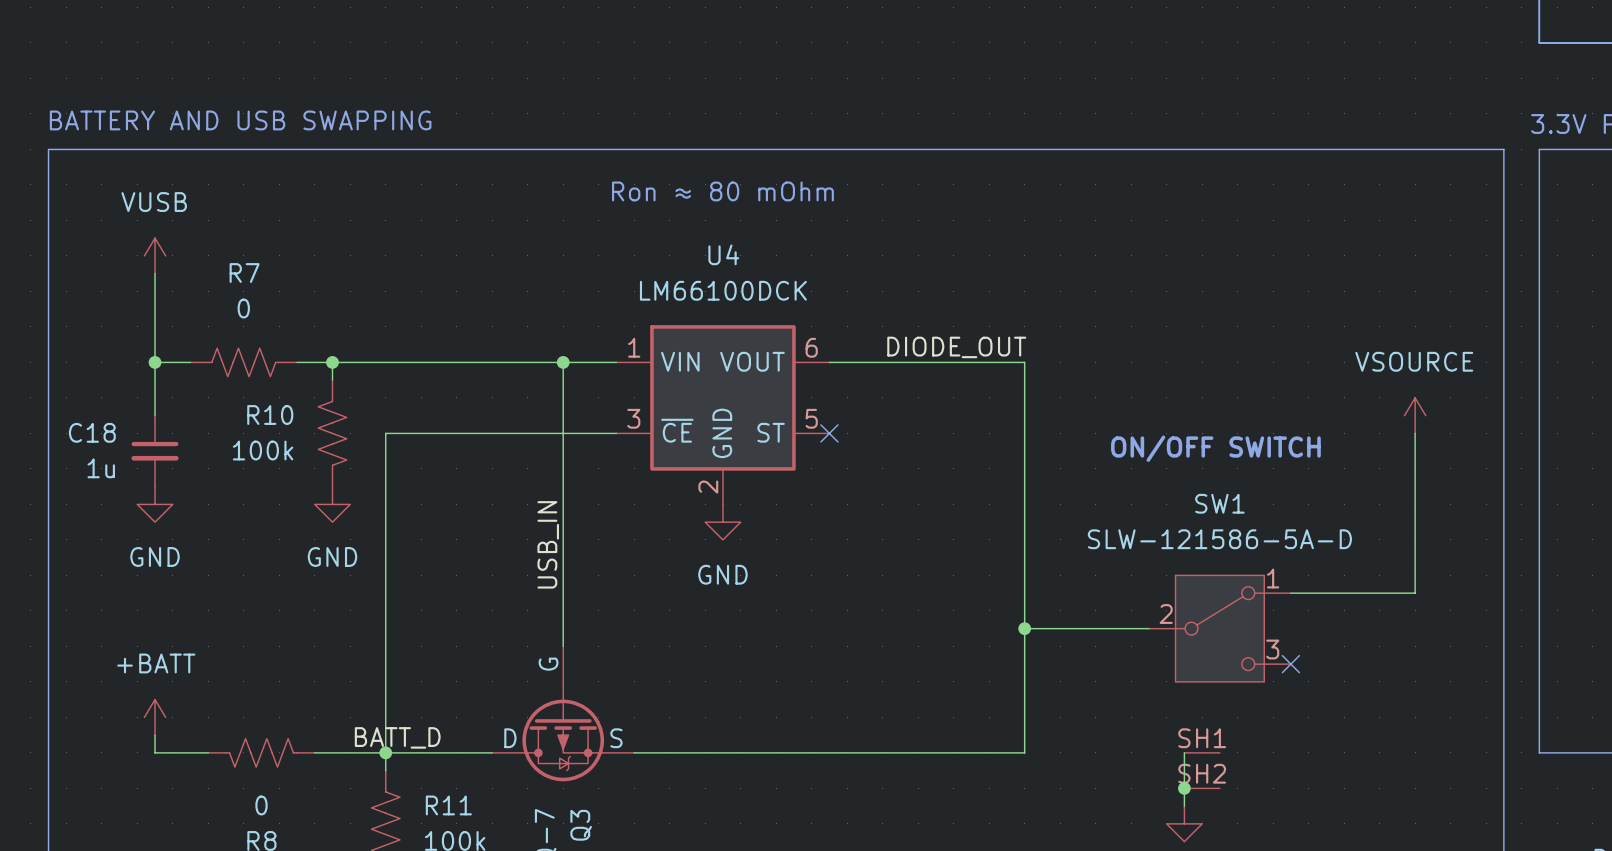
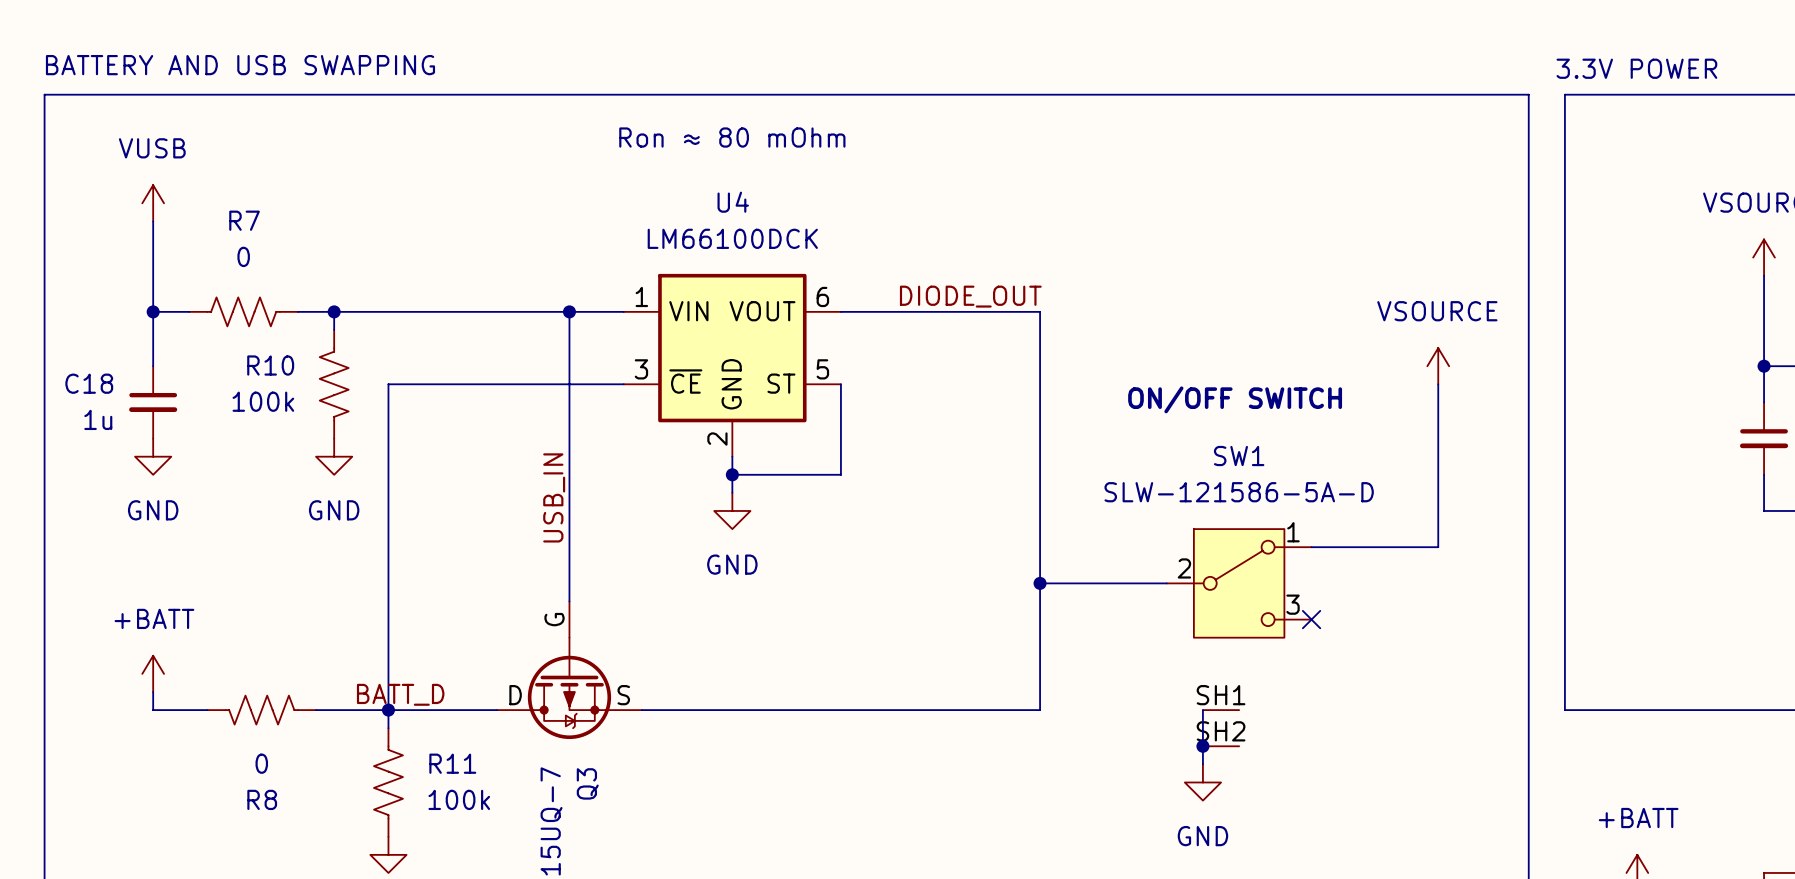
wire: none -> (840, 384) (840, 474) (732, 474)
no-connect mark: (829, 433) -> none
power symbol position: GND (722, 522) -> GND (732, 510)
junction: none -> (732, 474)

